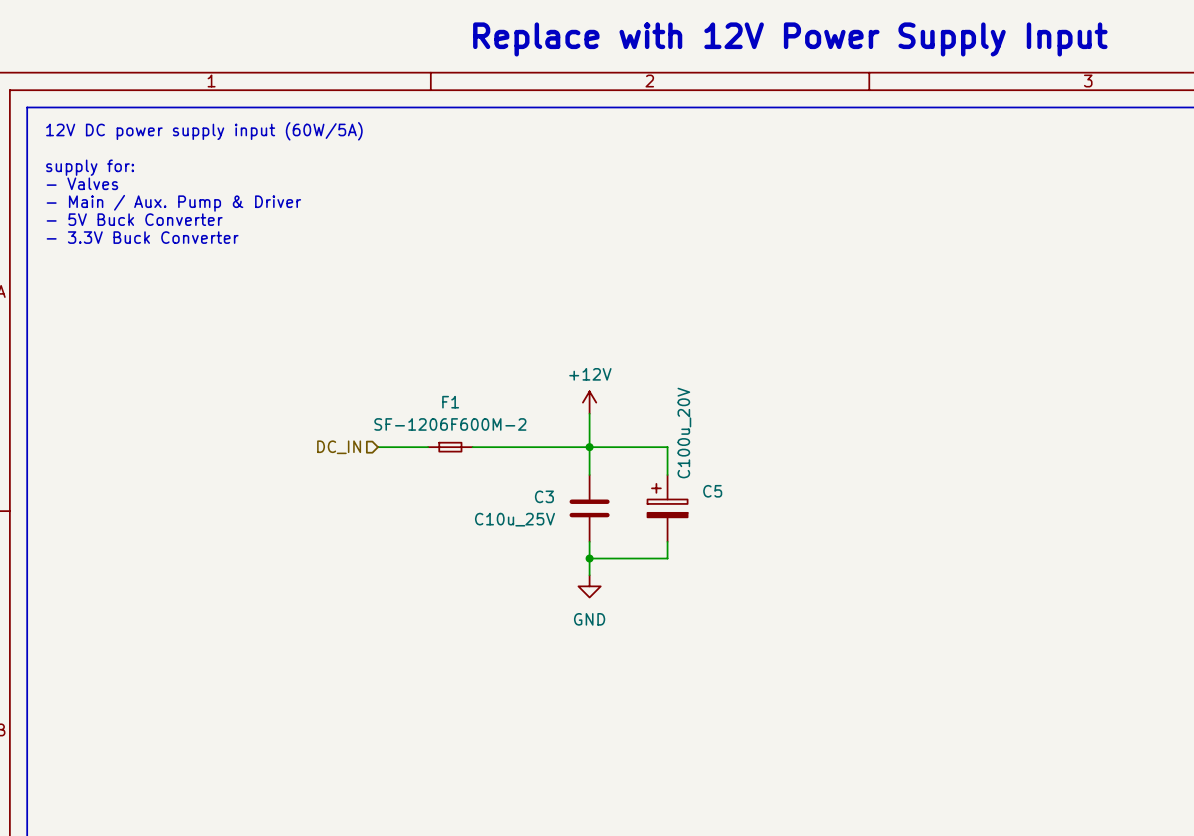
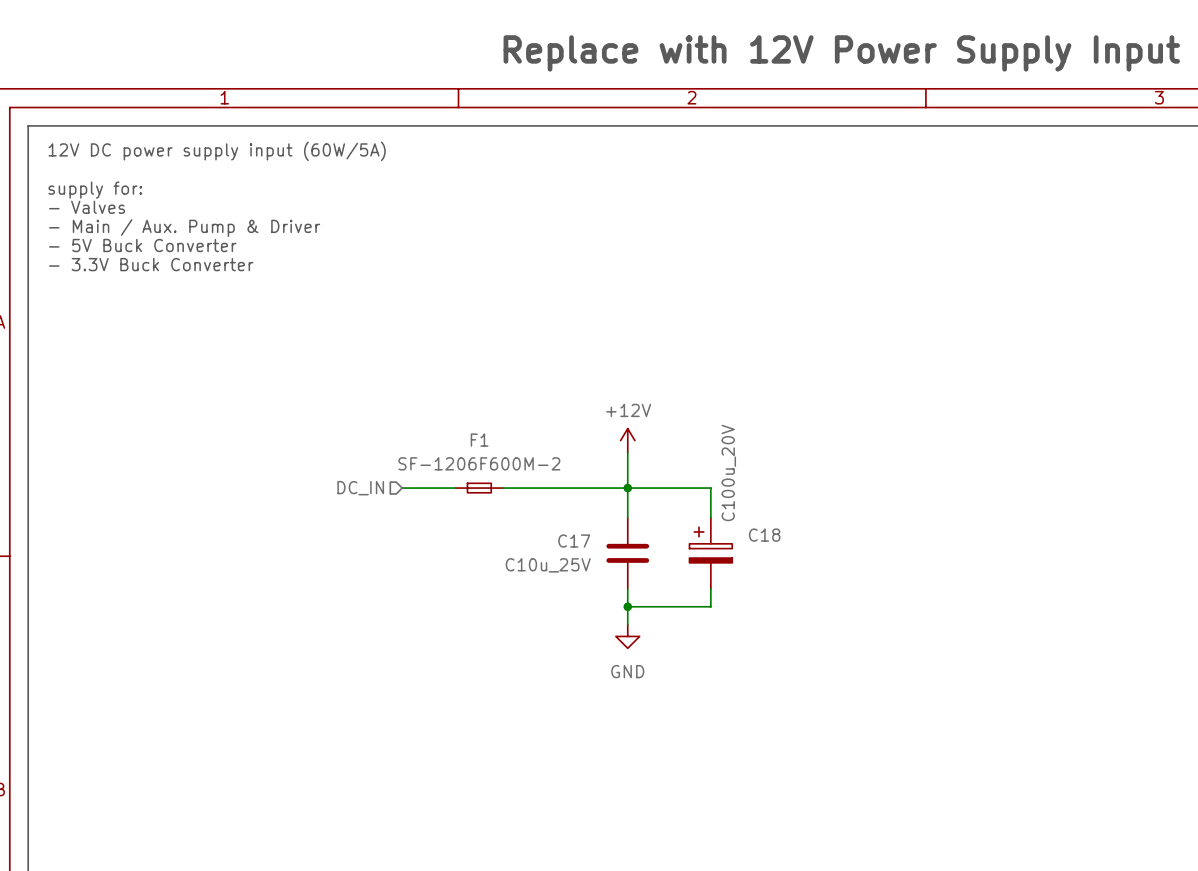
C5 name: C5 (712, 491) -> C18 (764, 535)
C3 name: C3 (544, 496) -> C17 (574, 541)

